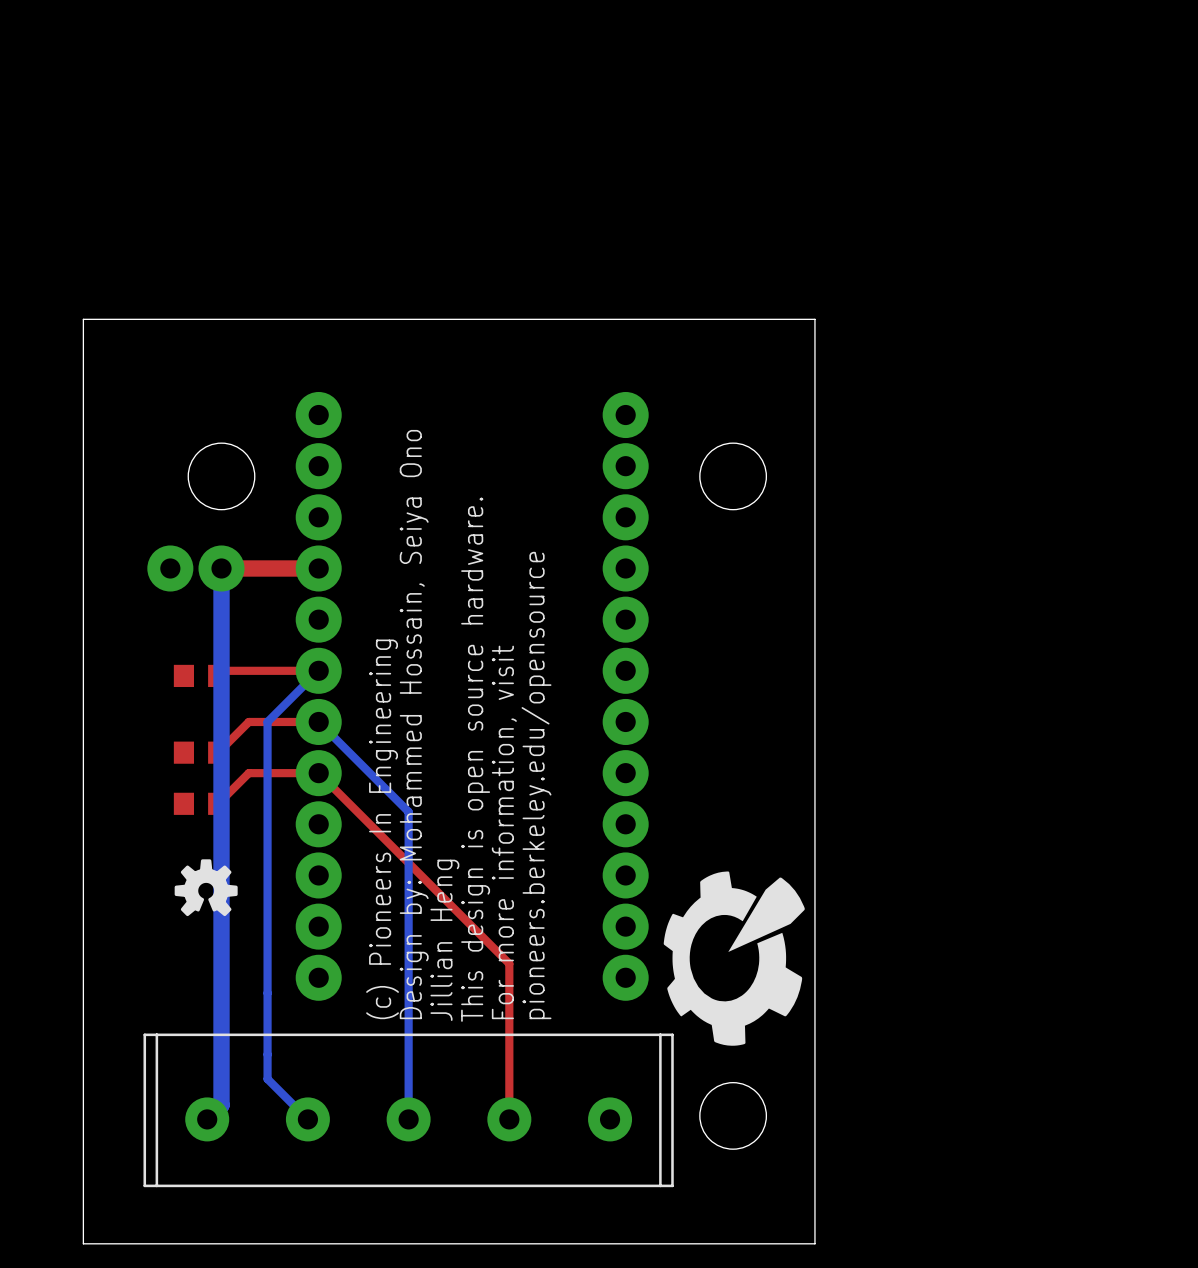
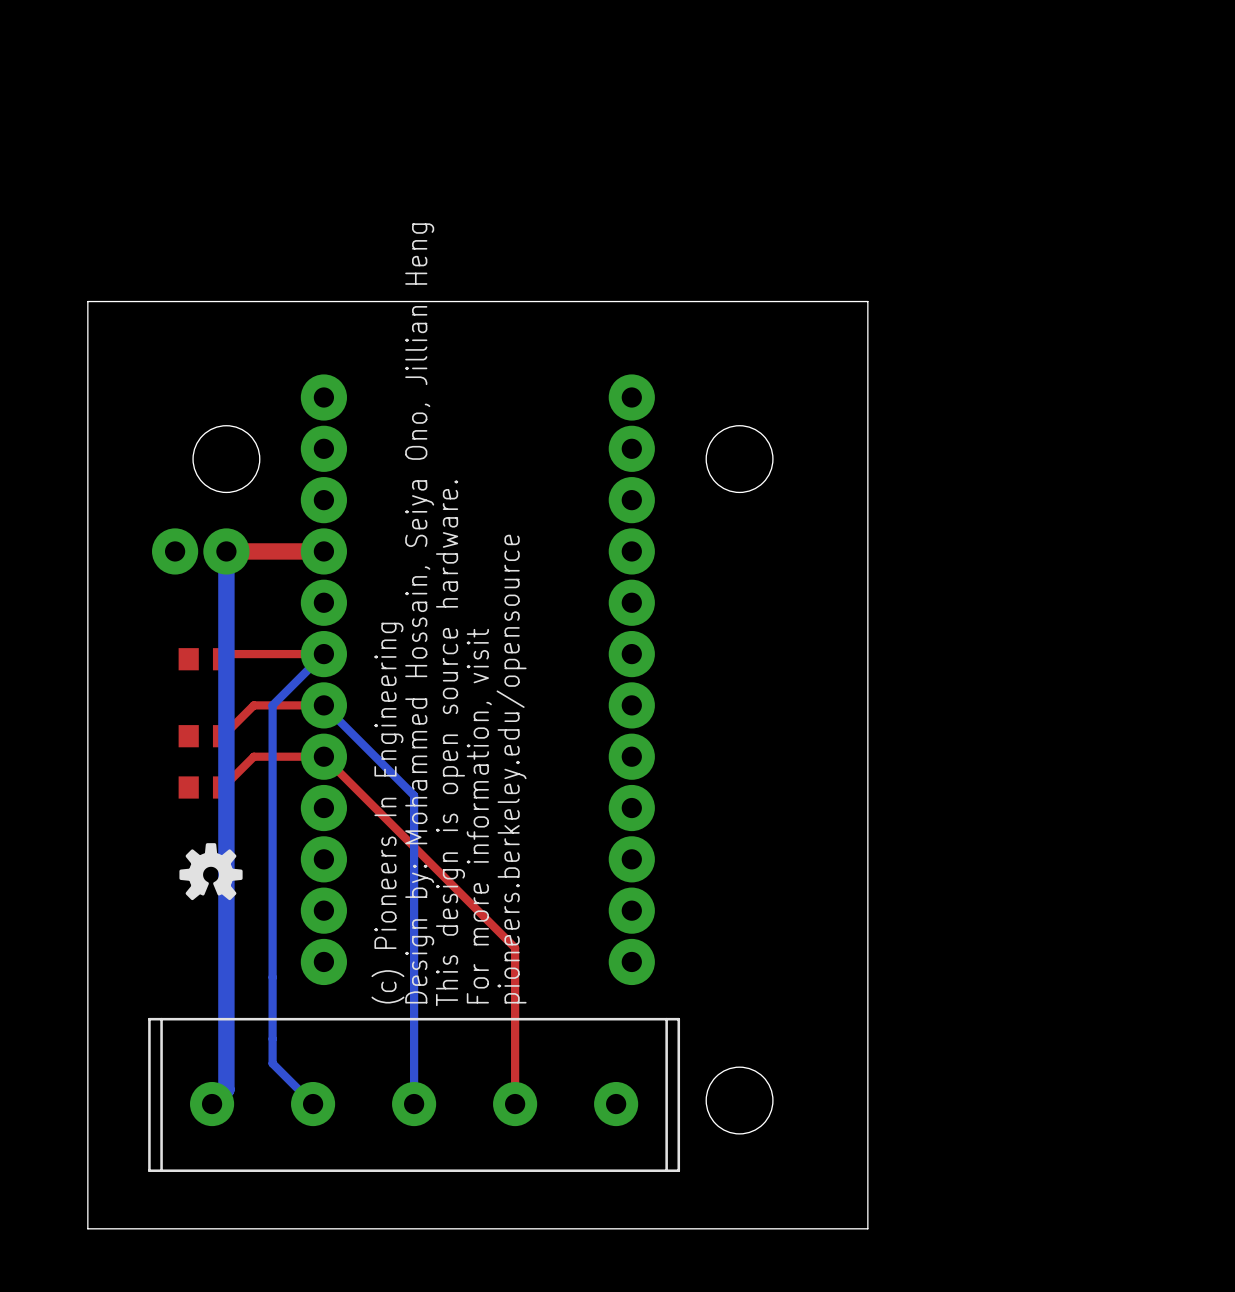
board edge: (814, 319) (814, 1243) -> (821, 301) (867, 301) (867, 1228) (821, 1228)
text: Design by: Mohammed Hossain, Seiya Ono (414, 724) -> Design by: Mohammed Hossain, Seiya Ono, Jillian Heng (419, 613)
text: This design is open source hardware. (475, 759) -> For more information, visit (479, 816)
text: pioneers.berkeley.edu/opensource (536, 785) -> none
text: For more information, visit (504, 832) -> pioneers.berkeley.edu/opensource (511, 769)
drawing: [663, 871, 805, 1046] -> none
text: Jillian Heng (444, 940) -> This design is open source hardware. (450, 743)

